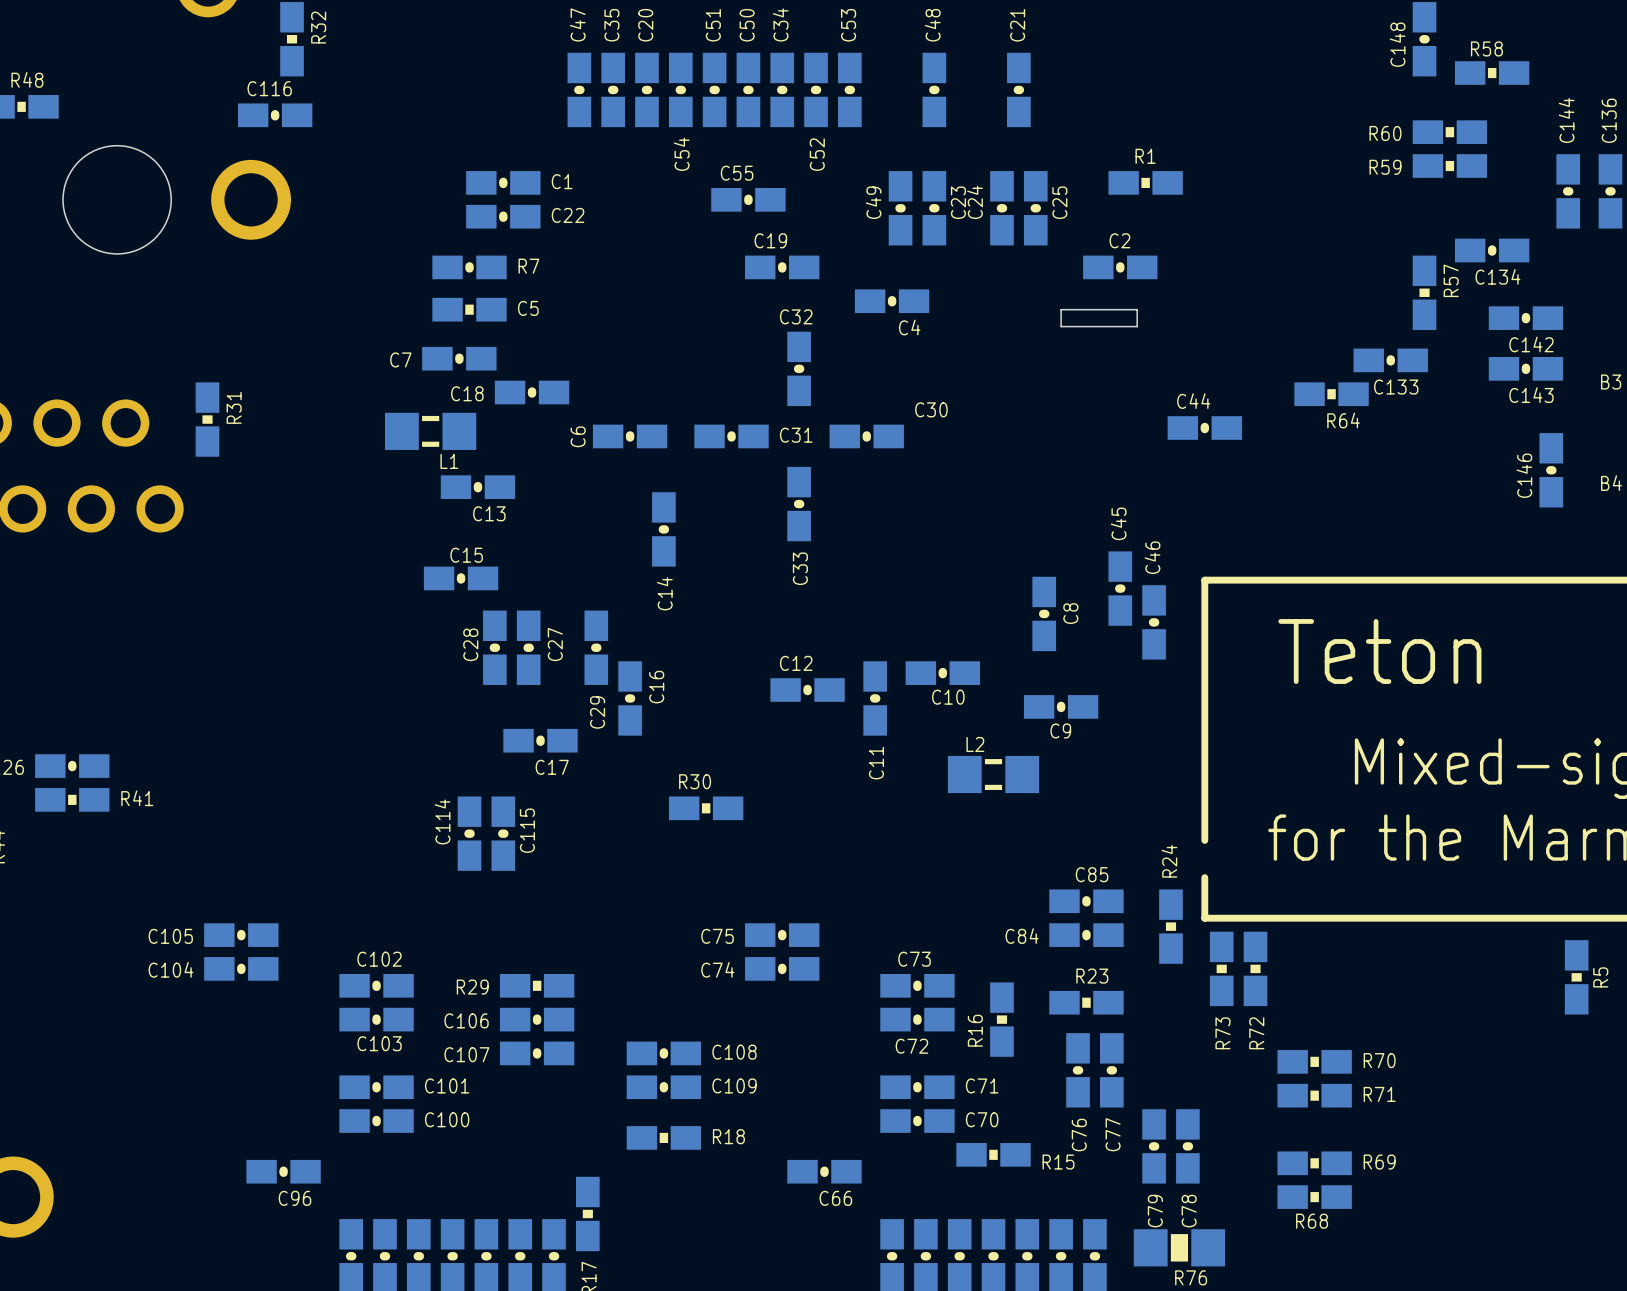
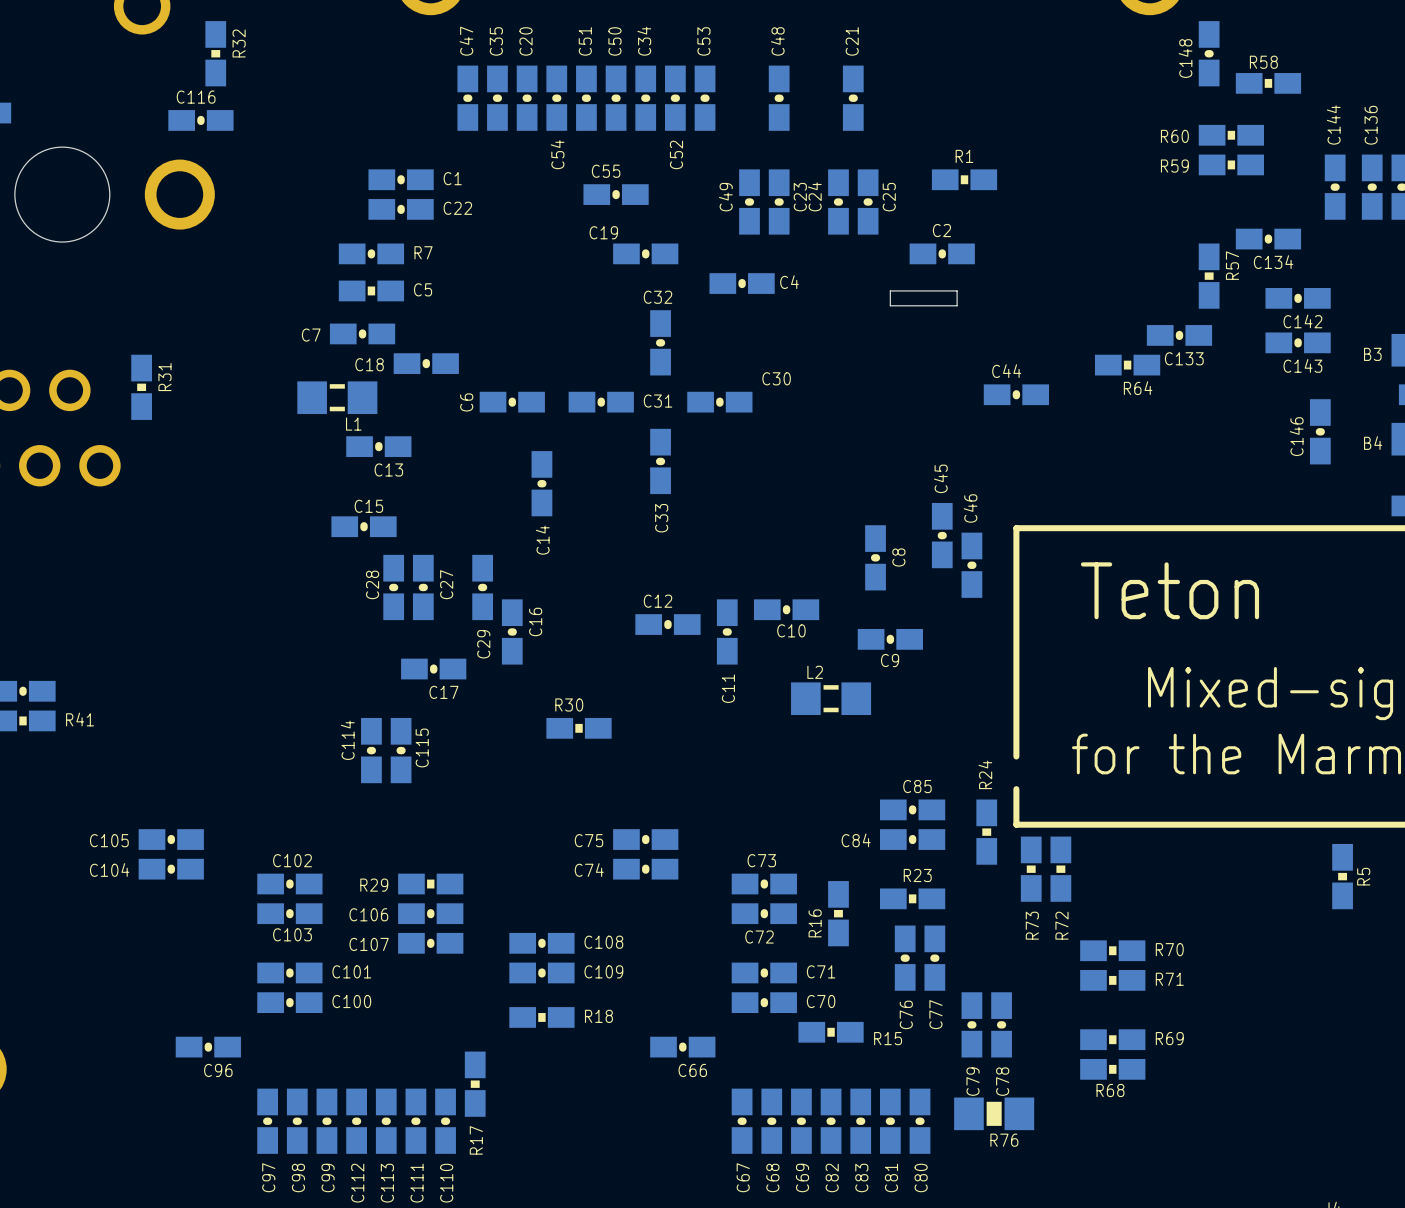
C19 name position: C19 (770, 240) -> C19 (603, 232)
C4 name position: C4 (909, 327) -> C4 (789, 282)

